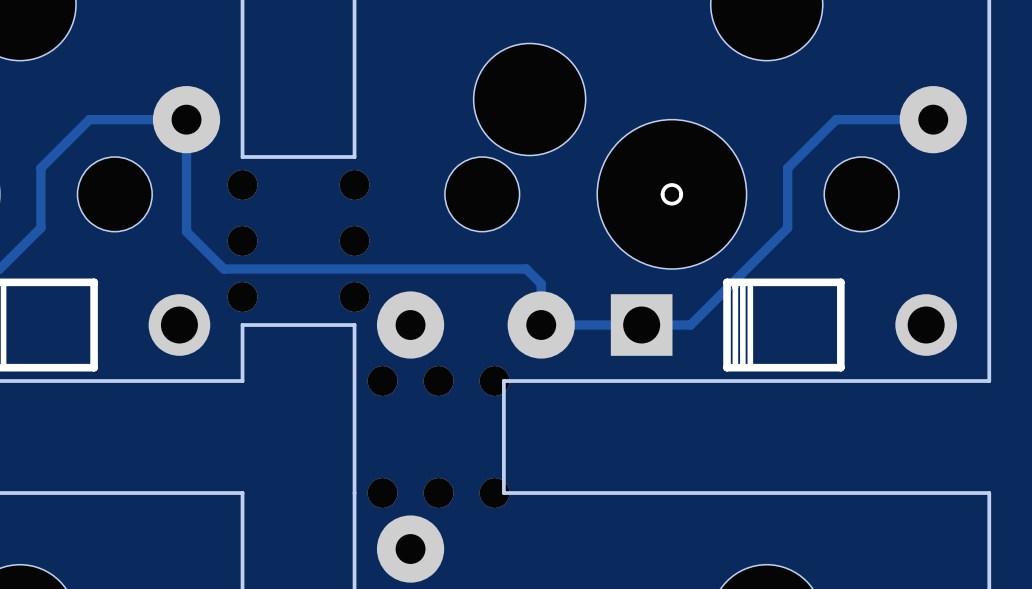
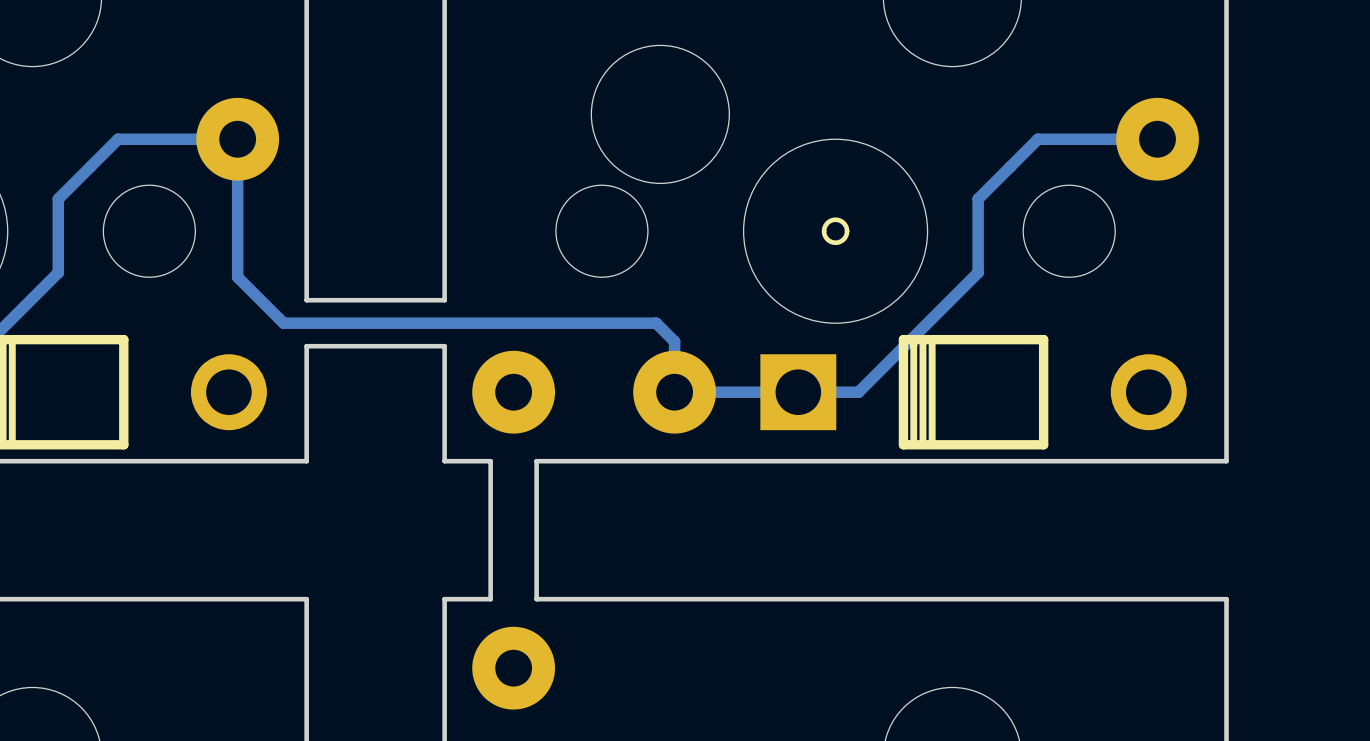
board edge: (354, 156) (242, 156) -> (444, 185) (444, 300) (306, 300) (306, 185)
part: (242, 241) -> none
part: (354, 241) -> none
board edge: (354, 325) (242, 325) -> (444, 392) (444, 346) (306, 346) (306, 392)
board edge: (354, 381) (354, 493) -> (444, 461) (490, 461) (490, 599) (444, 599)
part: (438, 381) -> none
board edge: (503, 381) (503, 493) -> (628, 461) (536, 461) (536, 599) (628, 599)
part: (438, 493) -> none

